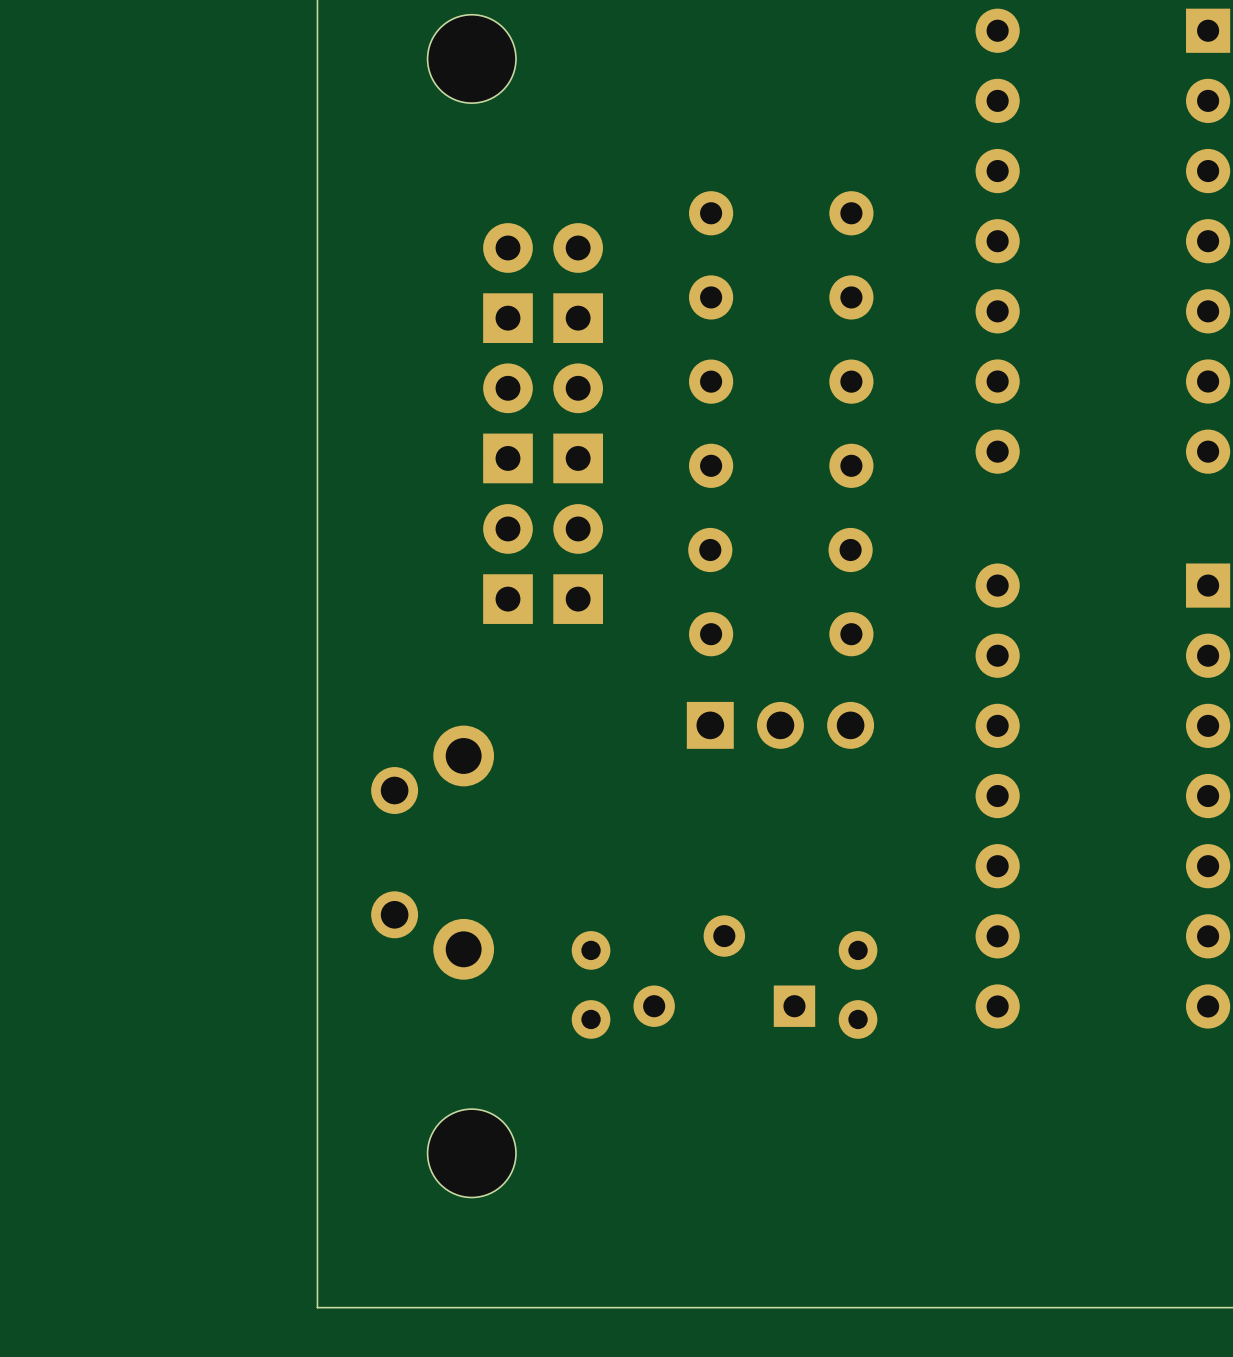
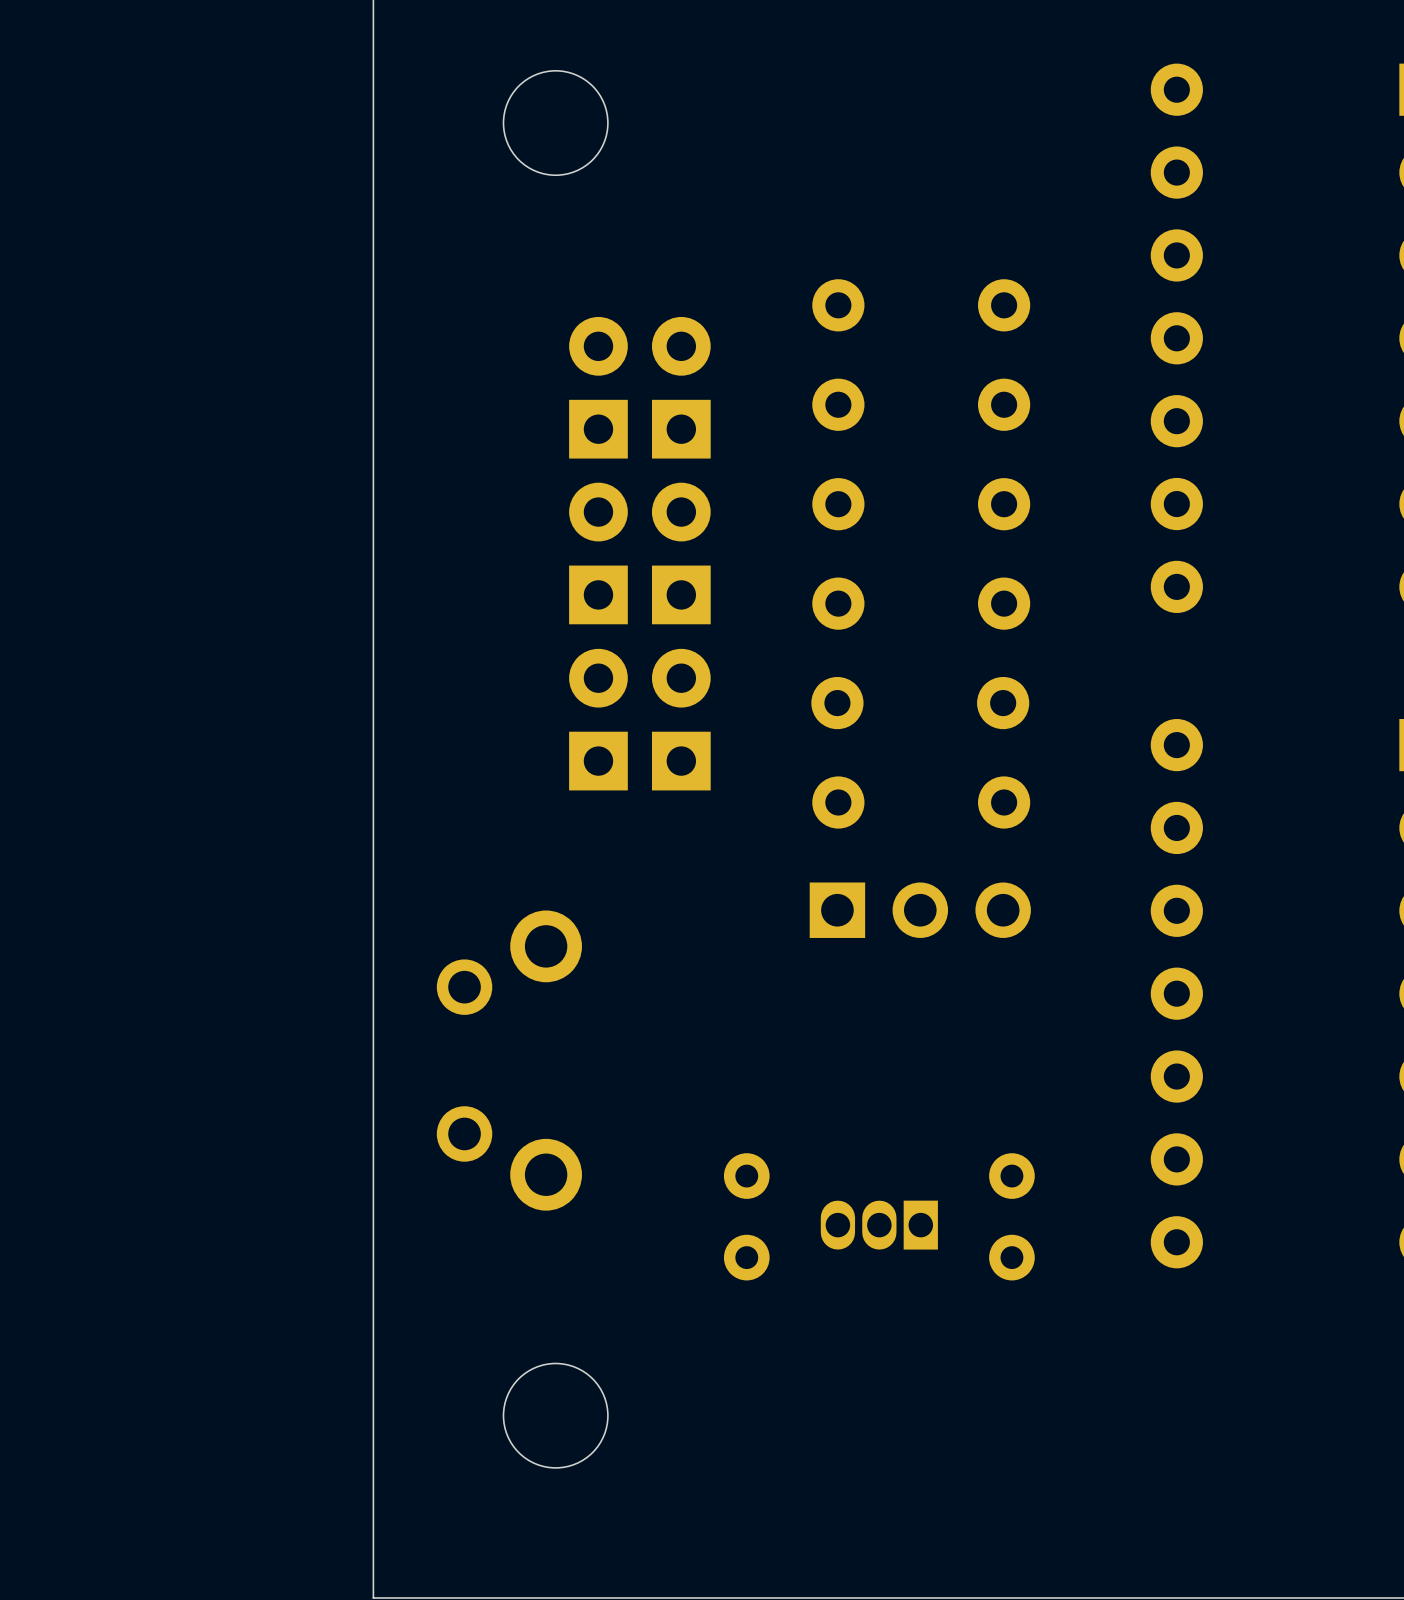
part: (724, 971) -> none
part position: (591, 984) -> (746, 1216)
part: none -> (879, 1225)

